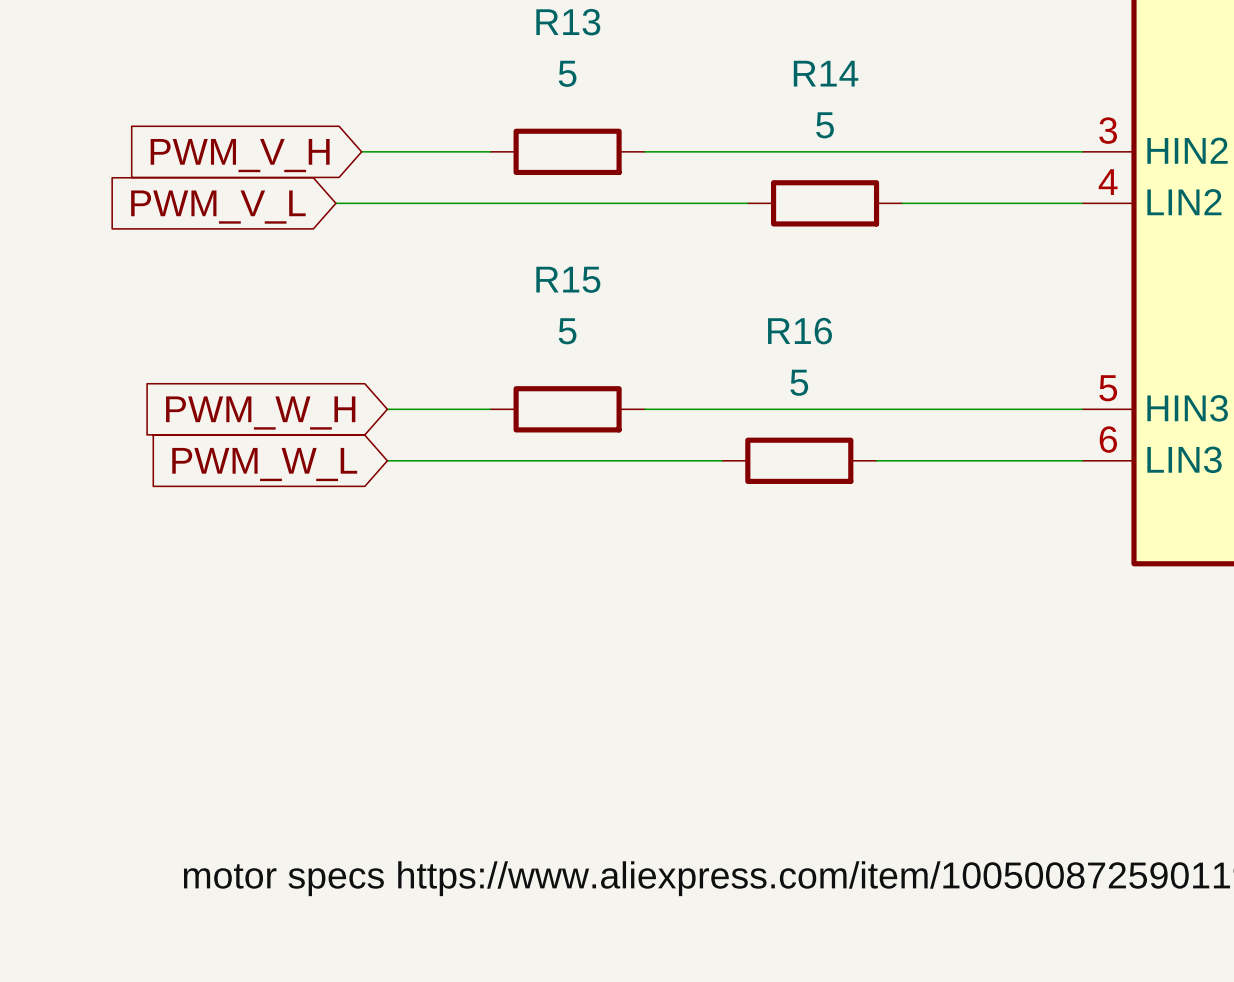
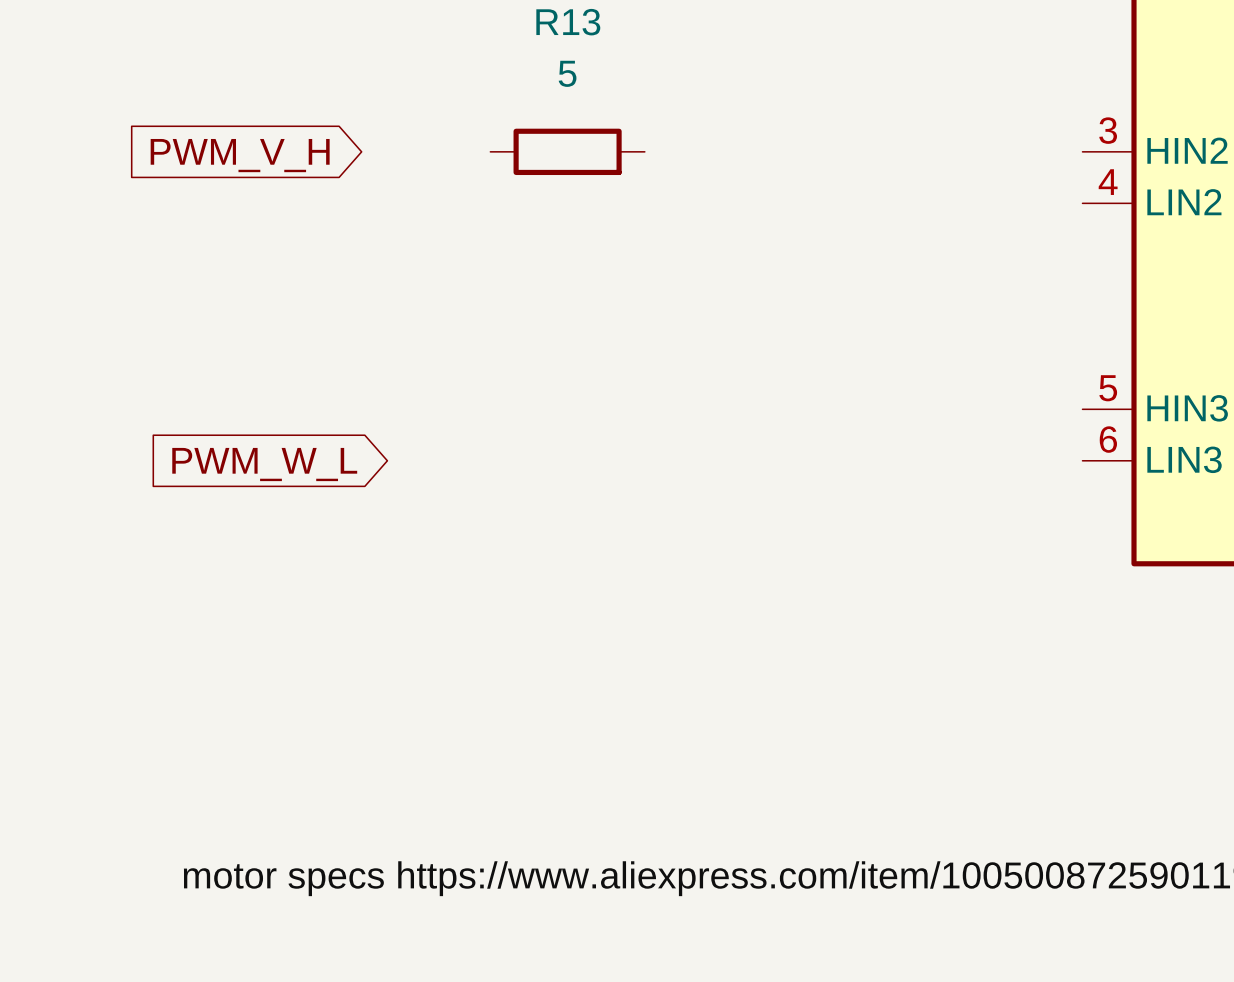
wire: (361, 151) (490, 151) -> none
wire: (644, 151) (1082, 151) -> none
wire: (335, 203) (747, 203) -> none
R14: 5 (825, 203) -> none
wire: (902, 203) (1082, 203) -> none
global label: PWM_V_L (218, 207) -> none
wire: (387, 409) (490, 409) -> none
R15: 5 (567, 409) -> none
wire: (644, 409) (1082, 409) -> none
global label: PWM_W_H (260, 413) -> none
wire: (387, 460) (722, 460) -> none
R16: 5 (799, 460) -> none
wire: (876, 460) (1082, 460) -> none

